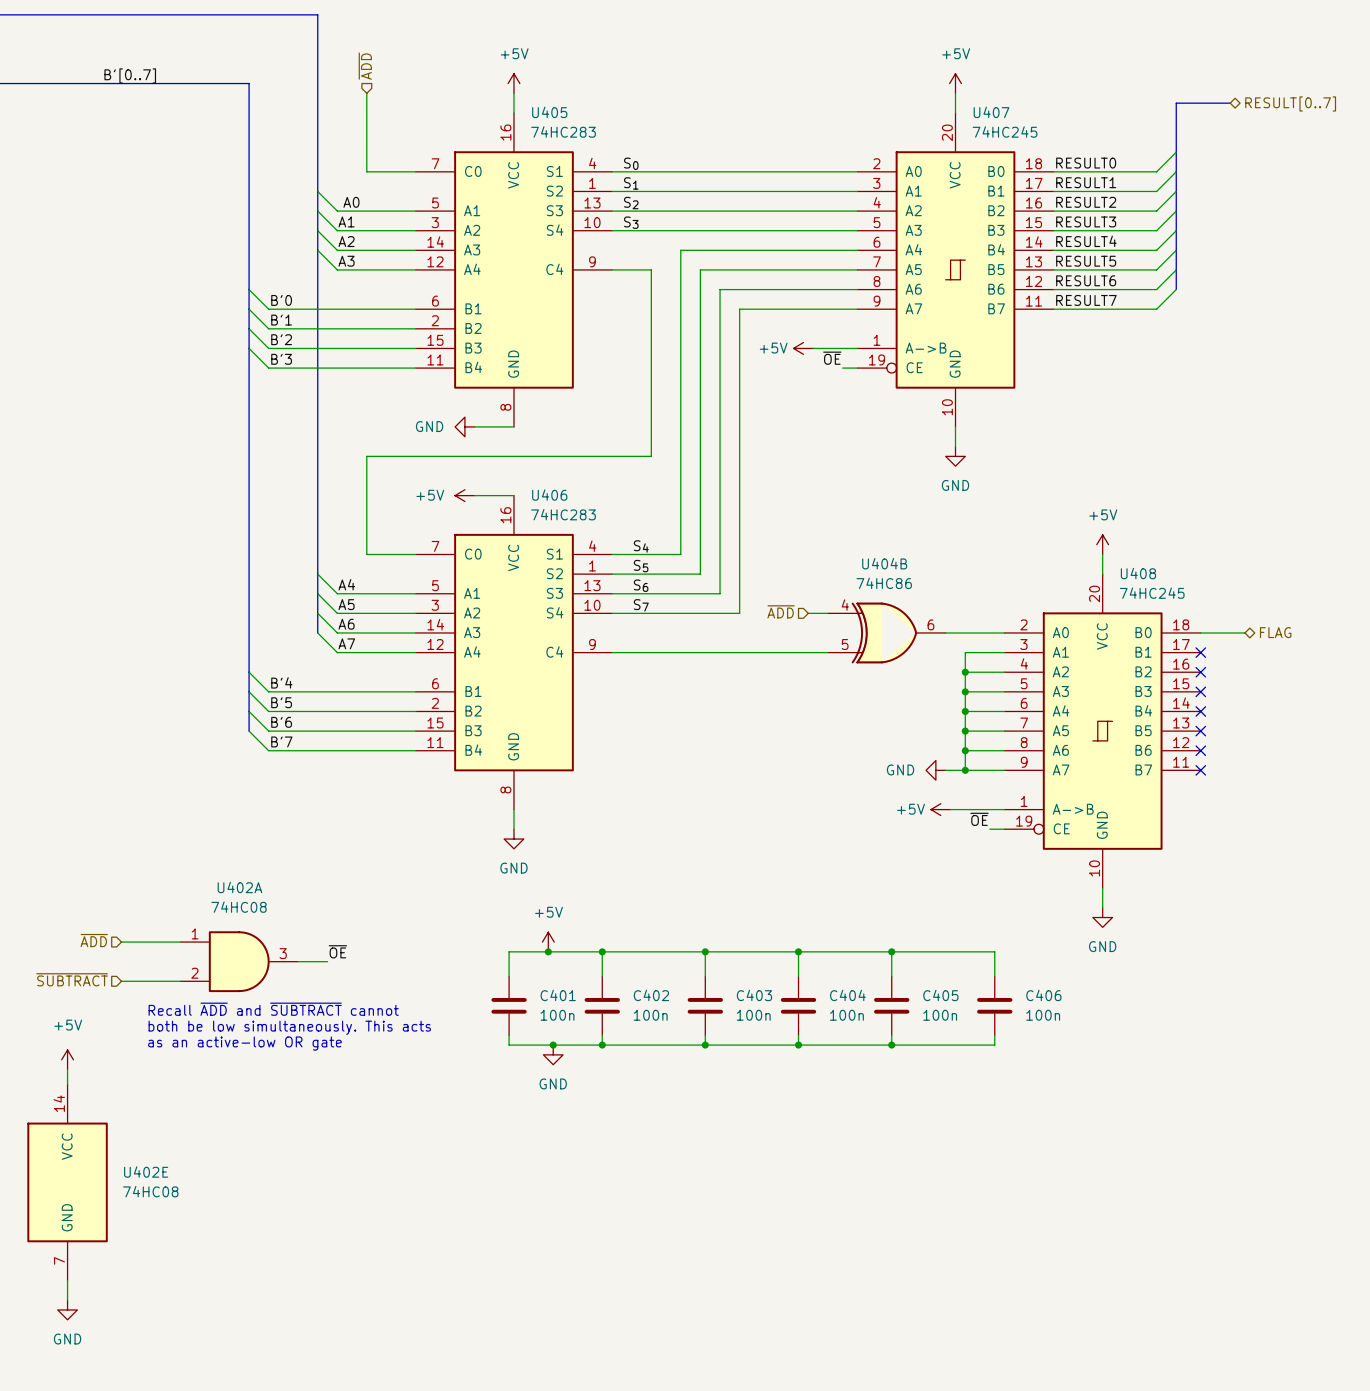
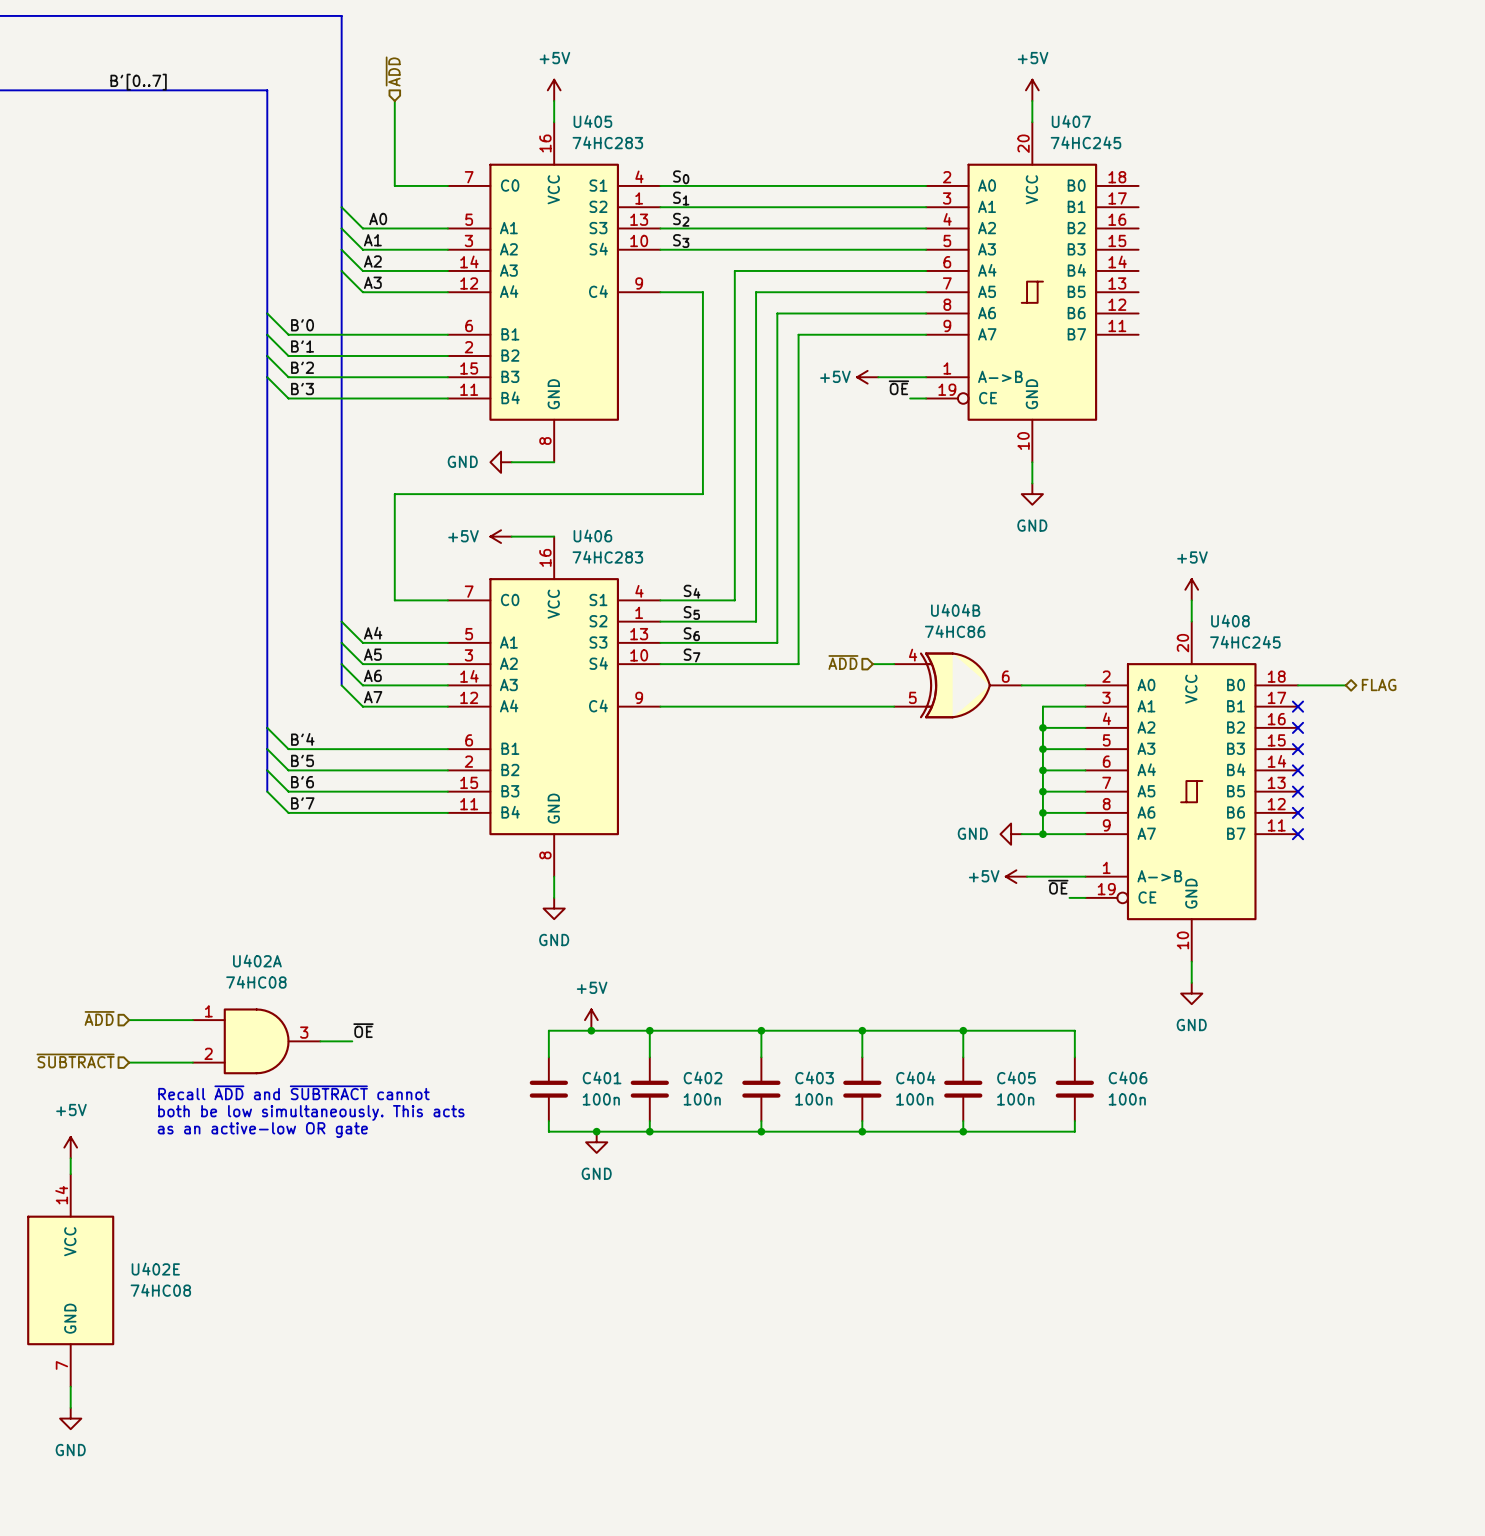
bus: (1230, 103) (1176, 103) (1176, 289) -> none
hierarchical label: RESULT[0..7] (1290, 103) -> none
wire: (1176, 152) (1156, 171) (1053, 171) -> none
label: RESULT0 (1086, 163) -> none
wire: (1176, 171) (1156, 191) (1053, 191) -> none
label: RESULT1 (1086, 182) -> none
wire: (1176, 191) (1156, 211) (1053, 211) -> none
label: RESULT2 (1086, 202) -> none
wire: (1176, 211) (1156, 230) (1053, 230) -> none
label: RESULT3 (1086, 221) -> none
wire: (1176, 230) (1156, 250) (1053, 250) -> none
label: RESULT4 (1086, 241) -> none
wire: (1176, 250) (1156, 269) (1053, 269) -> none
label: RESULT5 (1086, 261) -> none
wire: (1176, 269) (1156, 289) (1053, 289) -> none
label: RESULT6 (1086, 280) -> none
wire: (1176, 289) (1156, 309) (1053, 309) -> none
label: RESULT7 (1086, 300) -> none

